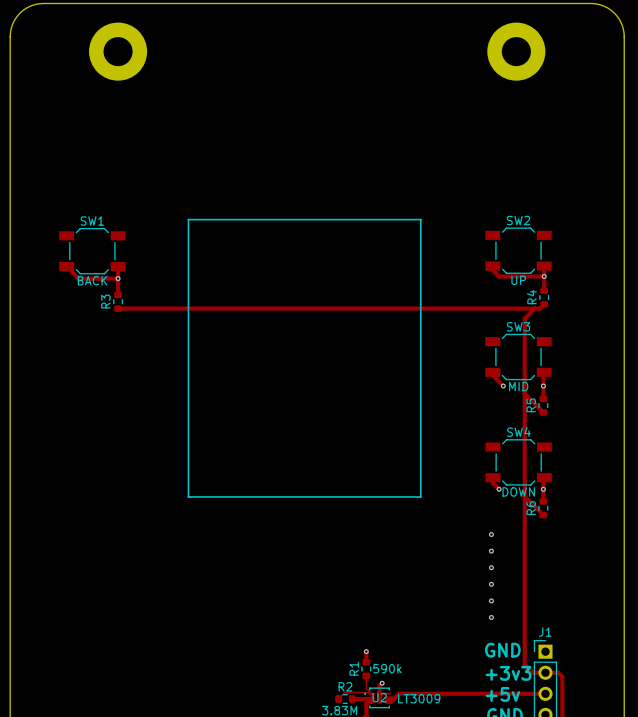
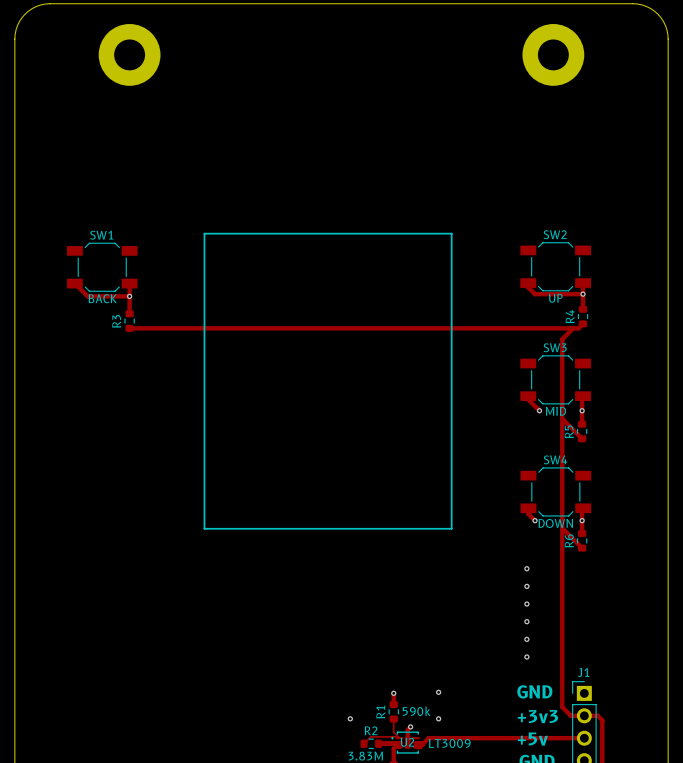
via: none -> (438, 692)
via: none -> (350, 718)
via: none -> (438, 718)

